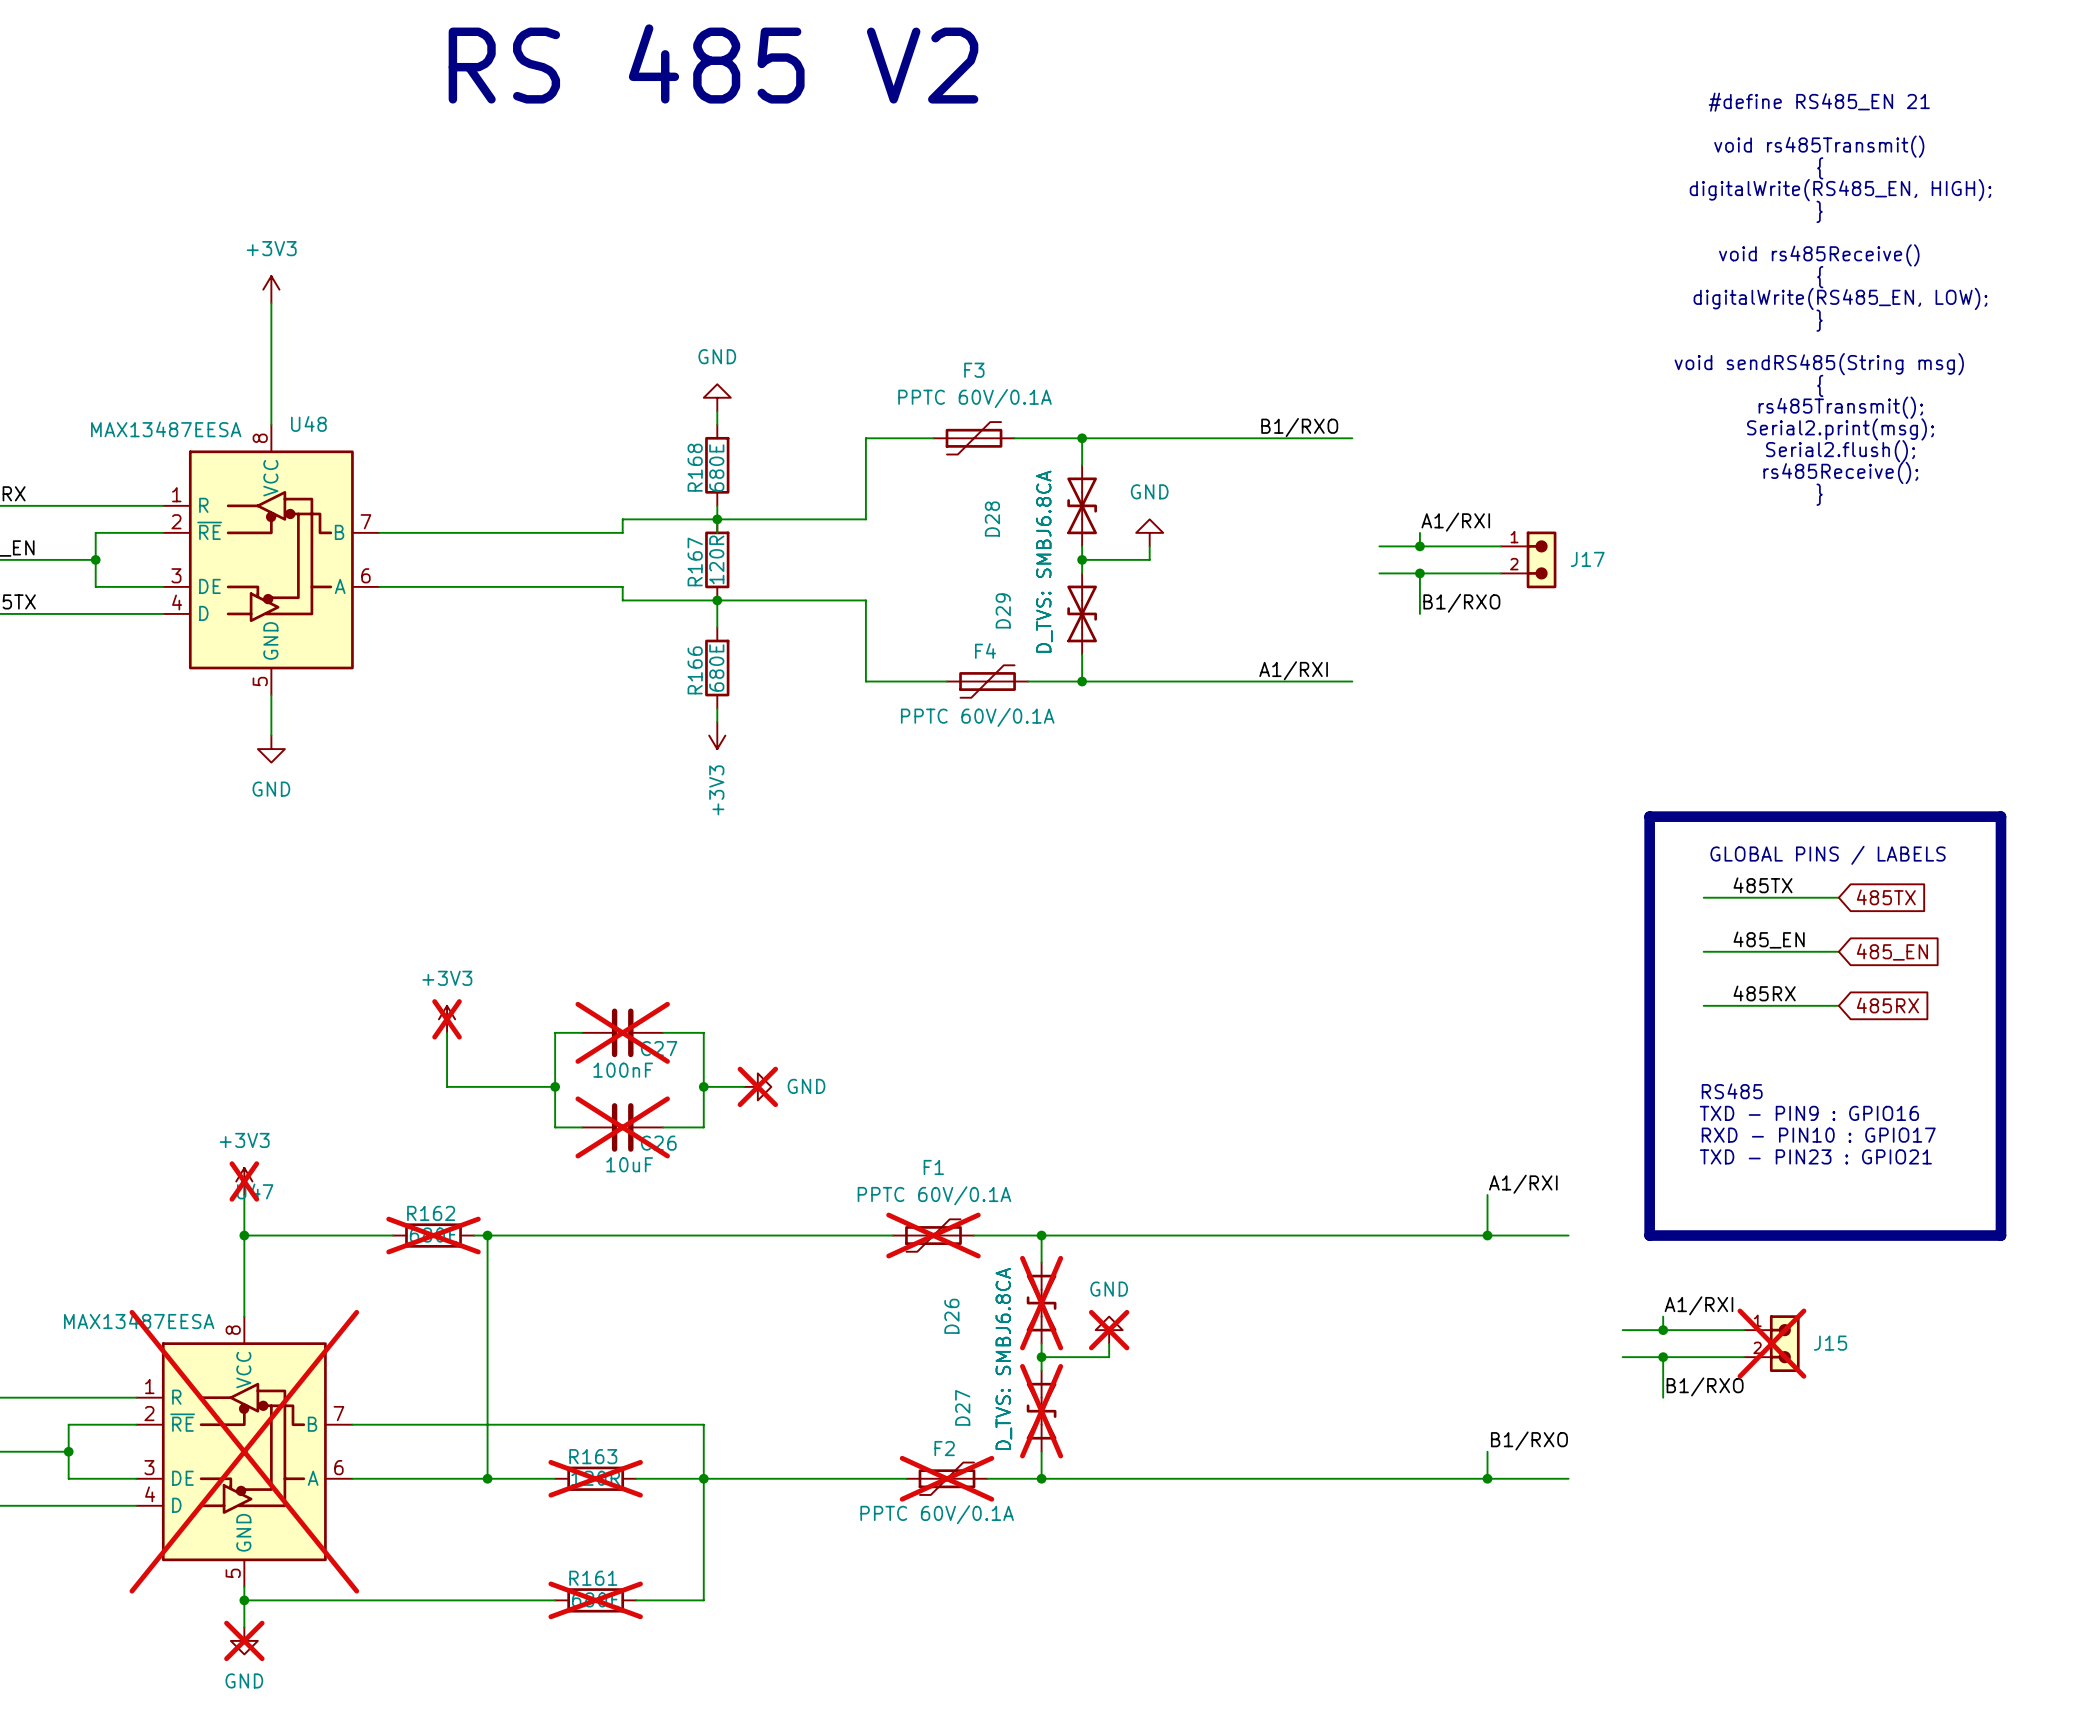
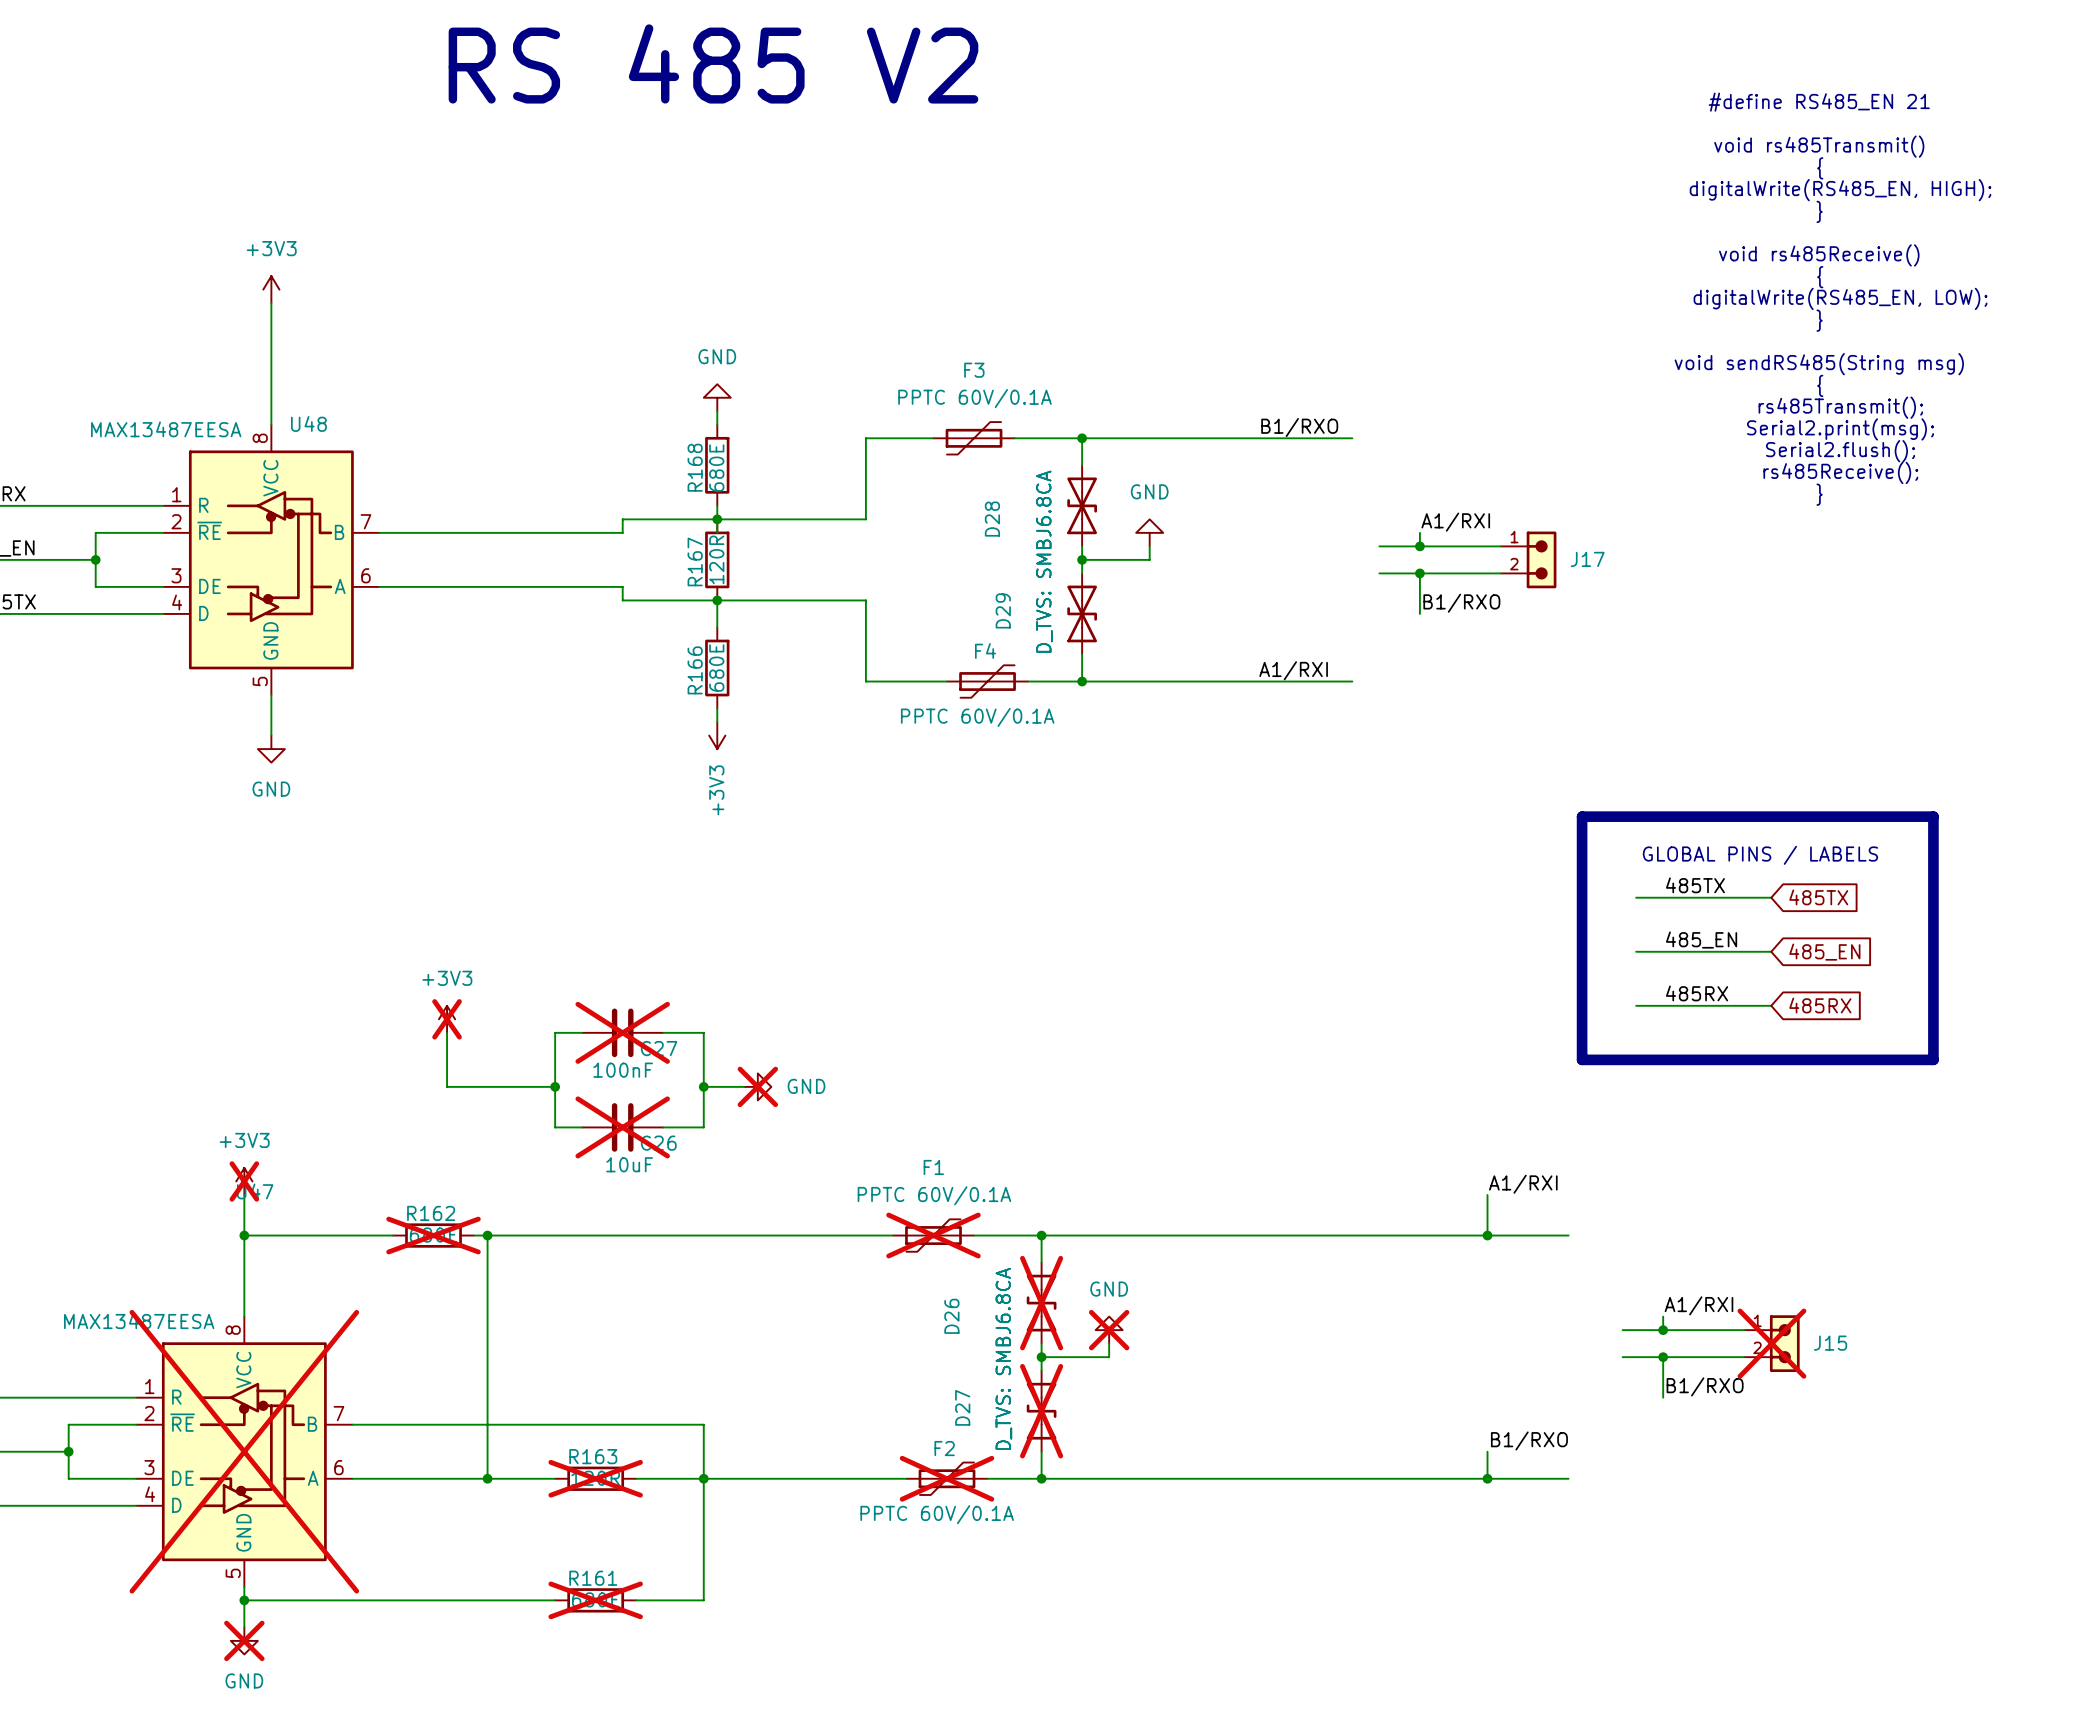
line: (1649, 816) (1649, 1235) (2000, 1235) (2000, 816) (1933, 816) -> (1649, 816) (1582, 816) (1582, 1059) (1933, 1059) (1933, 816)
text position: GLOBAL PINS / LABELS (1828, 855) -> GLOBAL PINS / LABELS (1760, 855)
label position: 485TX (1763, 885) -> 485TX (1695, 885)
wire: (1771, 897) (1838, 897) -> (1636, 897) (1703, 897)
global label position: 485TX (1886, 897) -> 485TX (1818, 897)
label position: 485_EN (1769, 940) -> 485_EN (1701, 940)
wire: (1771, 951) (1838, 951) -> (1636, 951) (1703, 951)
global label position: 485_EN (1892, 952) -> 485_EN (1824, 952)
label position: 485RX (1764, 993) -> 485RX (1697, 993)
wire: (1771, 1005) (1838, 1005) -> (1636, 1005) (1703, 1005)
global label position: 485RX (1887, 1005) -> 485RX (1820, 1005)
text: RS485 (1732, 1091) -> none
text: TXD - PIN9 : GPIO16 (1809, 1113) -> none
text: RXD - PIN10 : GPIO17 (1818, 1135) -> none
text: TXD - PIN23 : GPIO21 (1815, 1156) -> none

